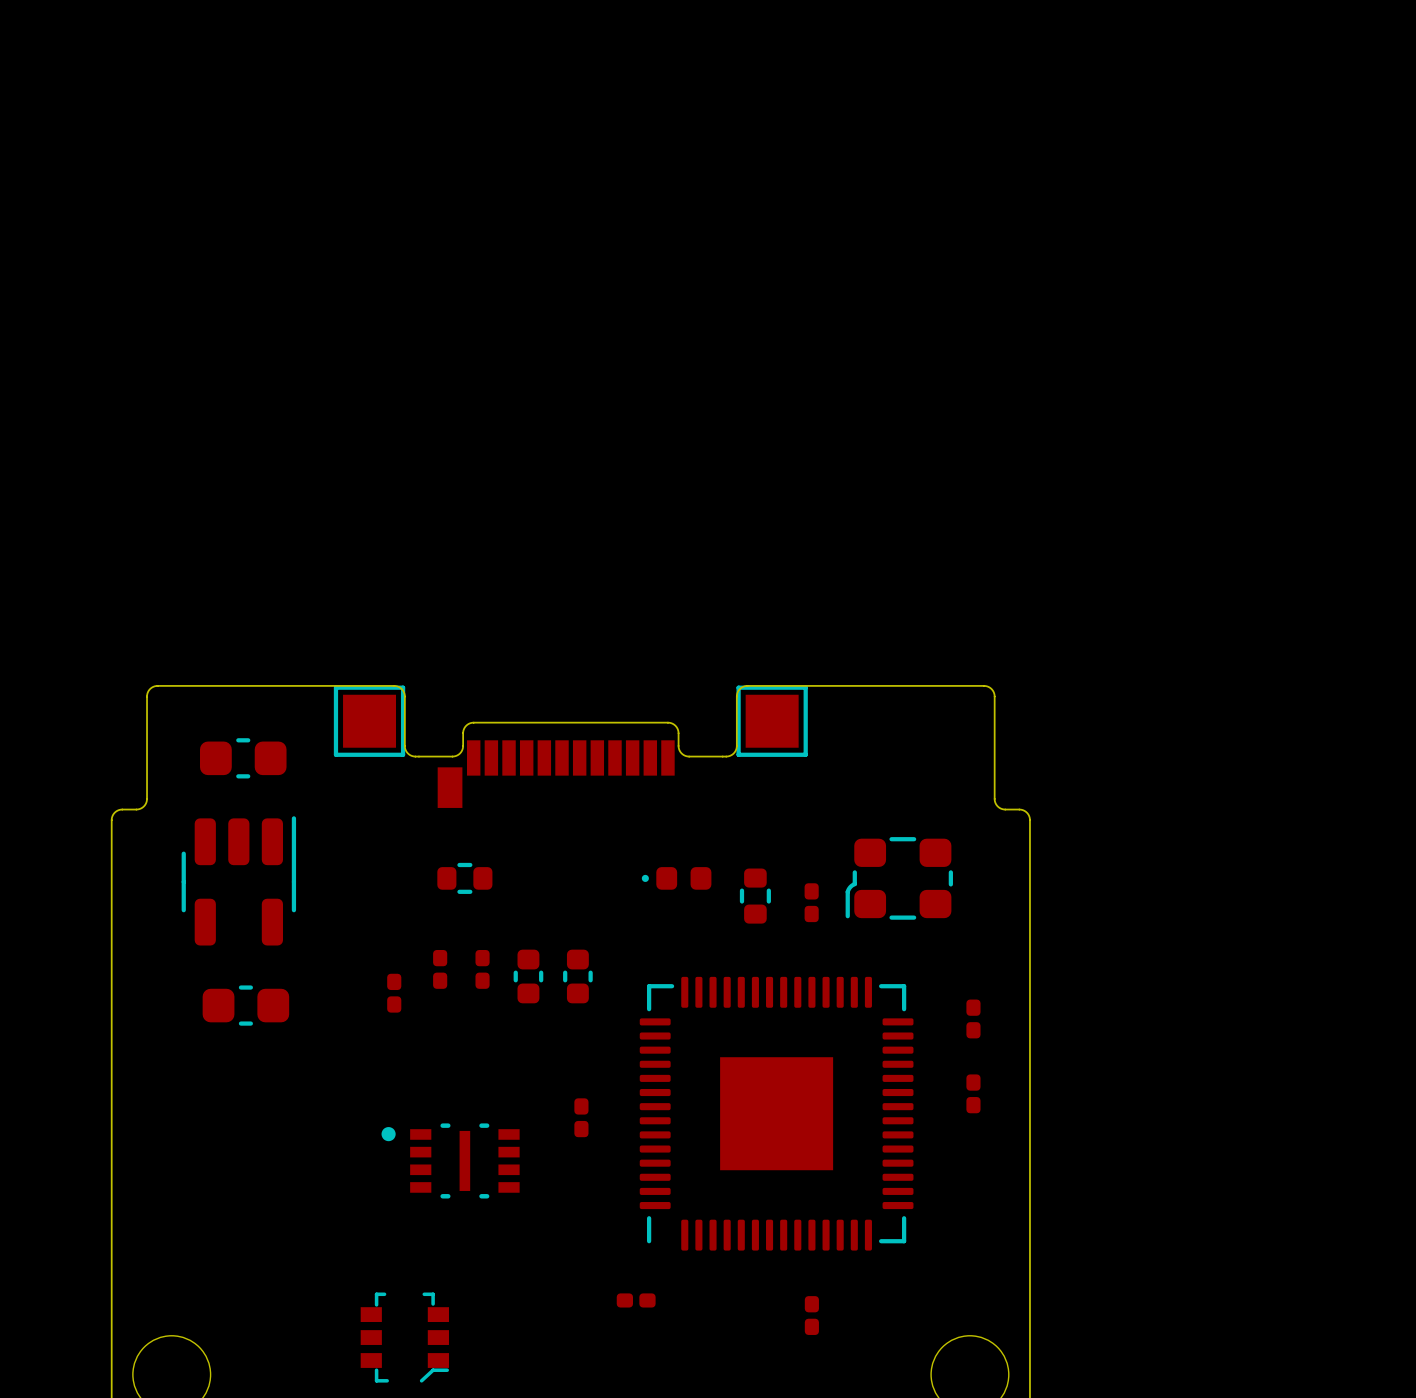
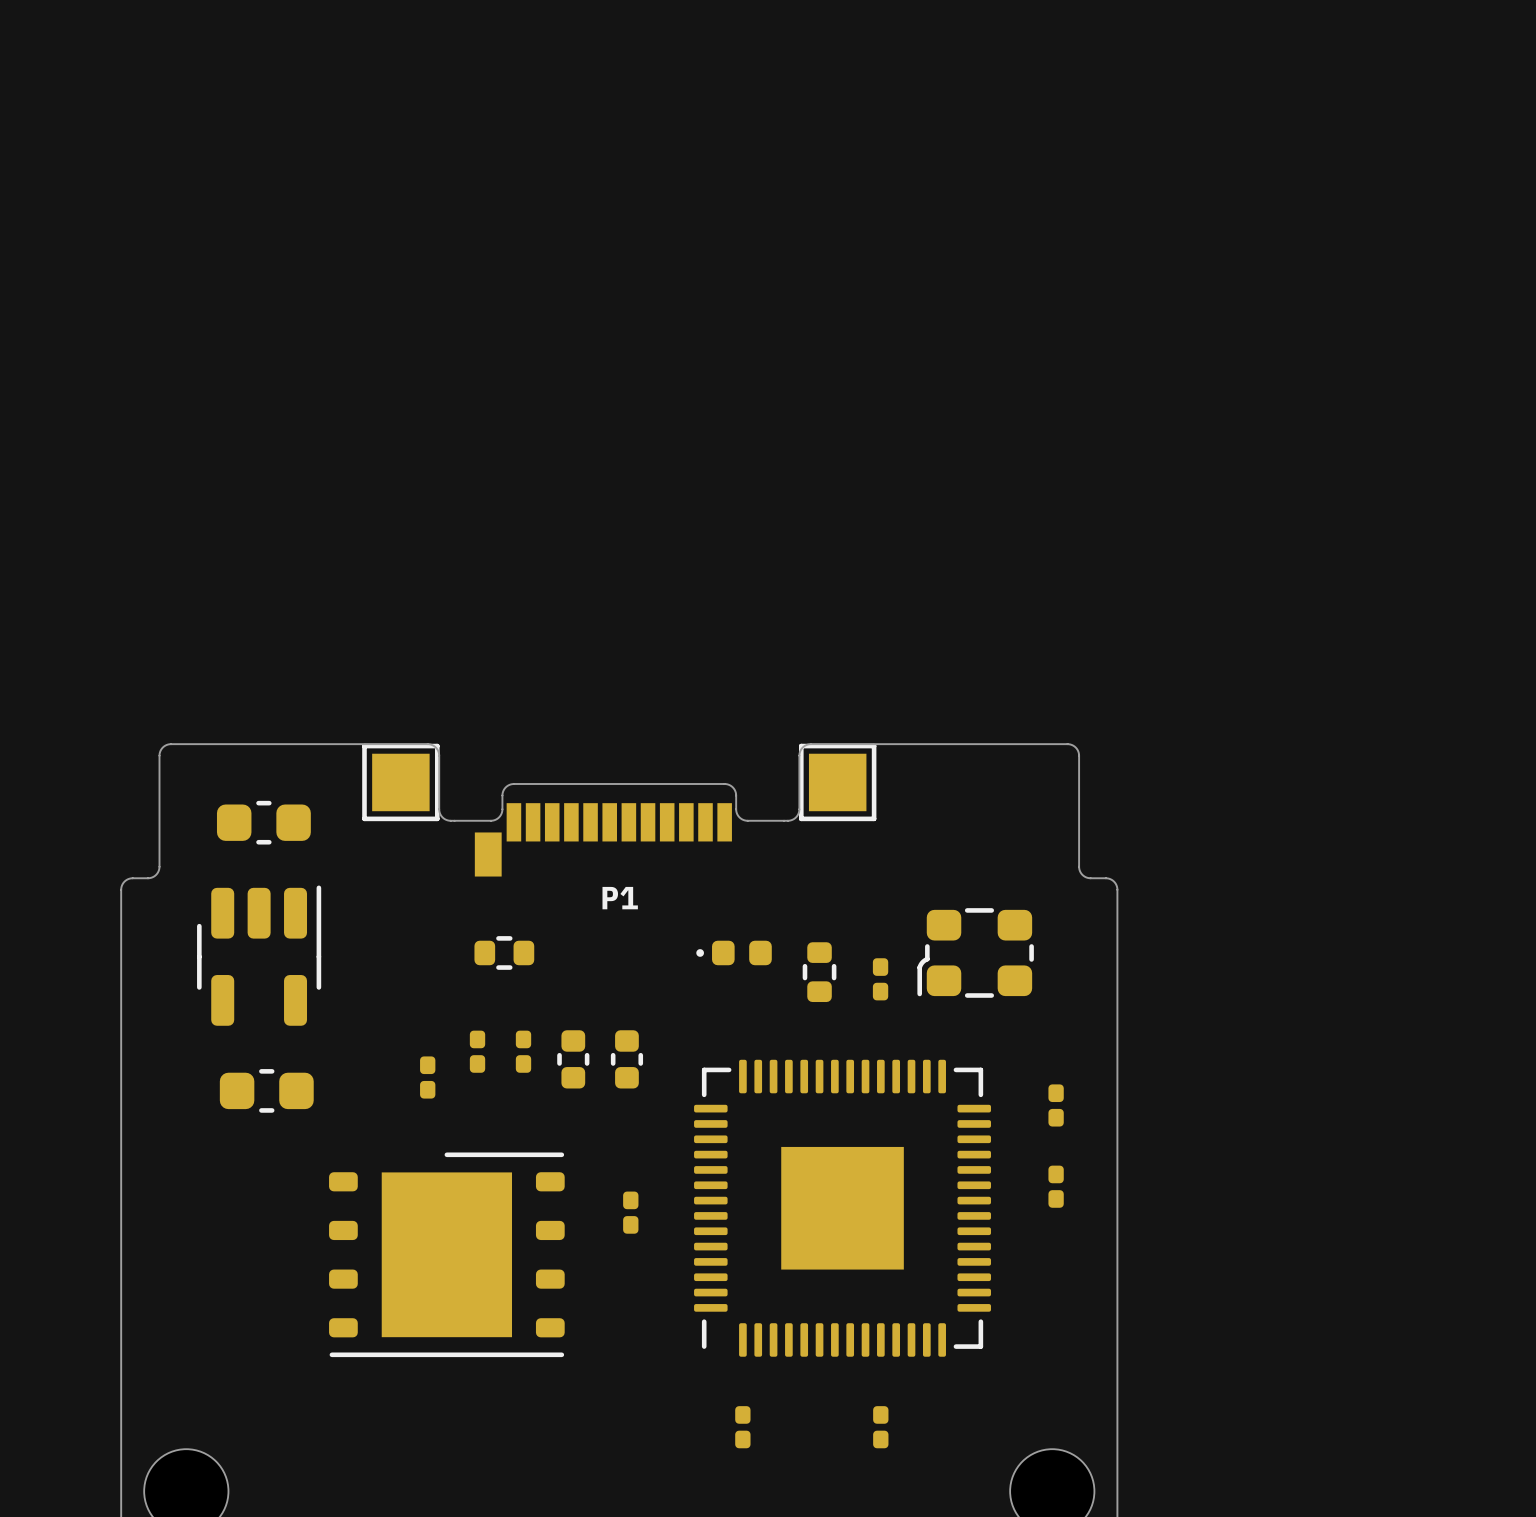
P1 name: none -> P1 (620, 898)
part: none -> (446, 1254)
part: (450, 1160) -> none
part rotation: 0° (636, 1300) -> 90° clockwise (742, 1427)
part position: (636, 1300) -> (742, 1427)
part: (404, 1337) -> none

